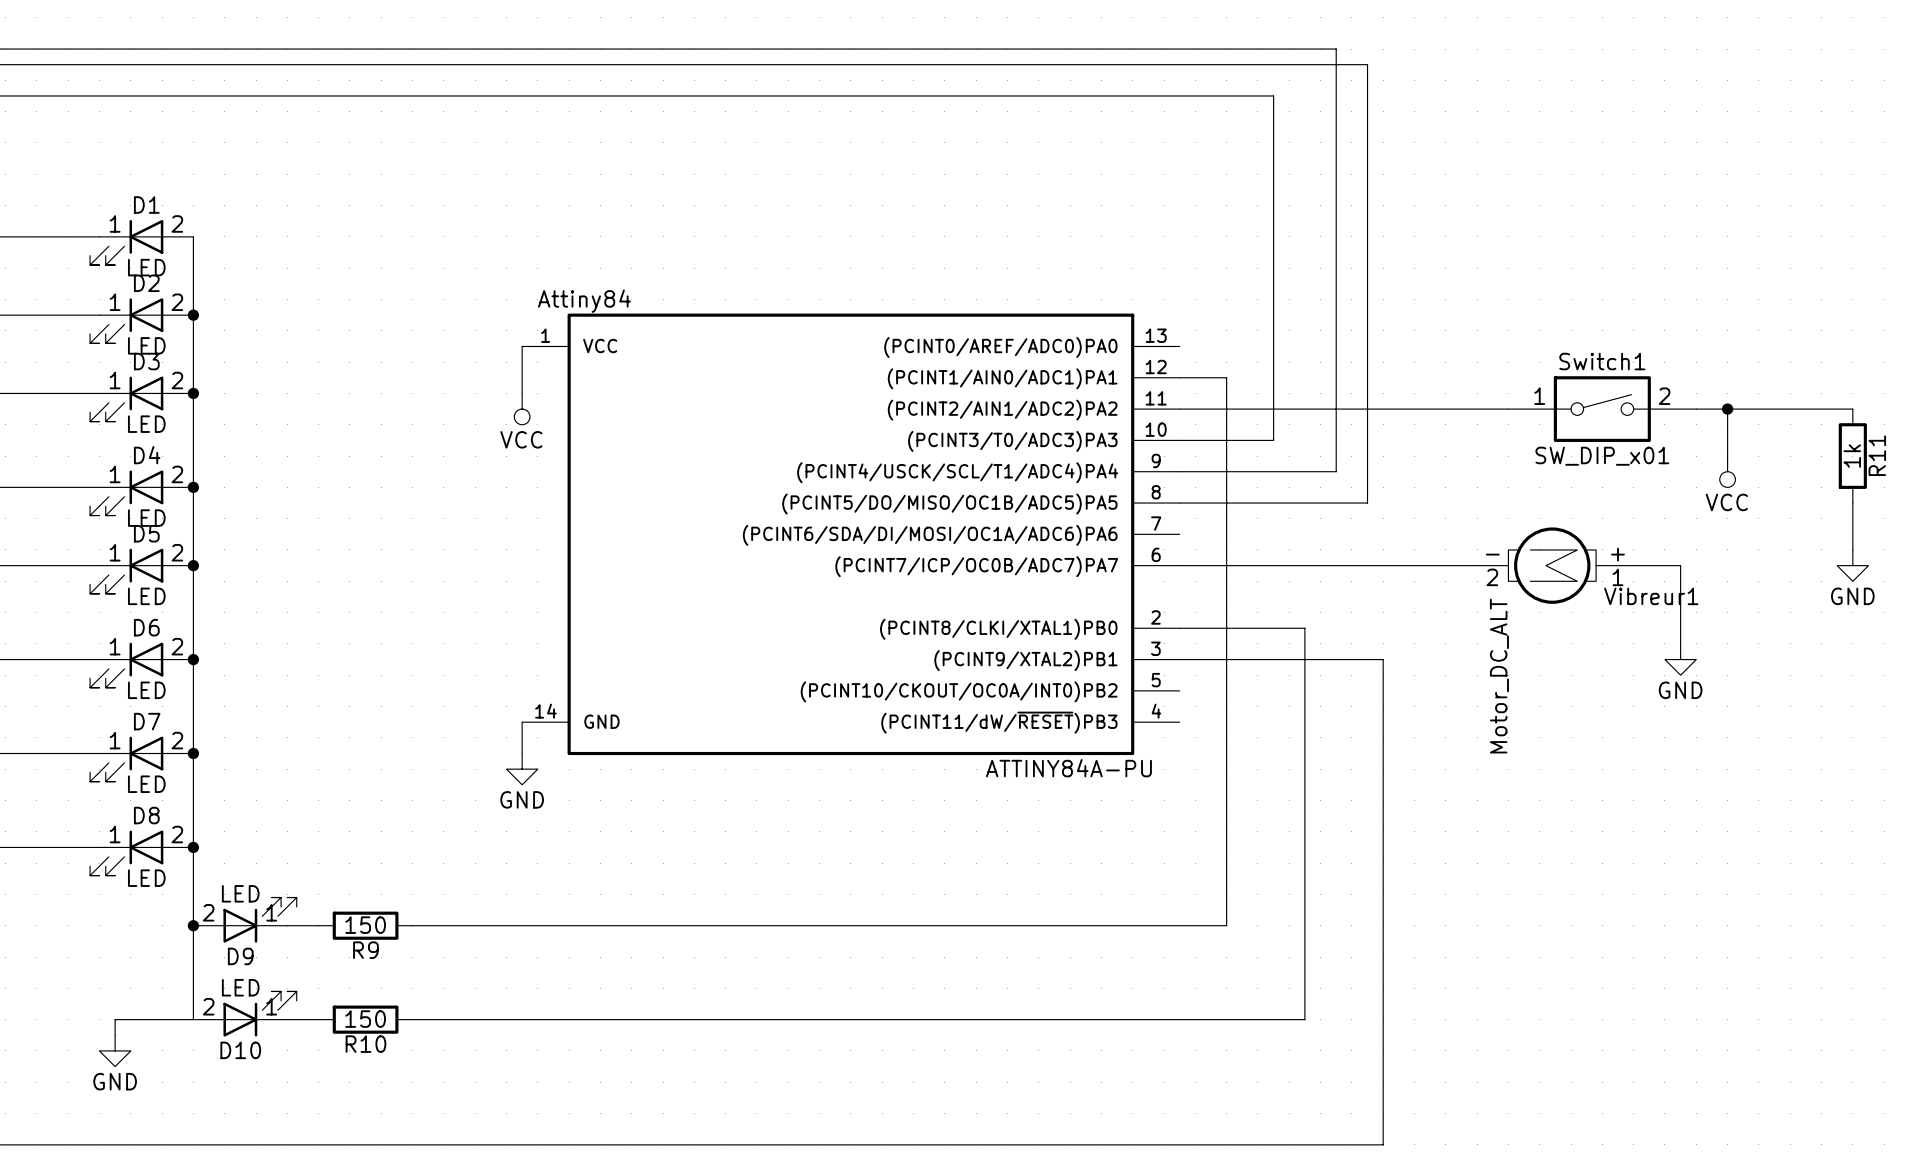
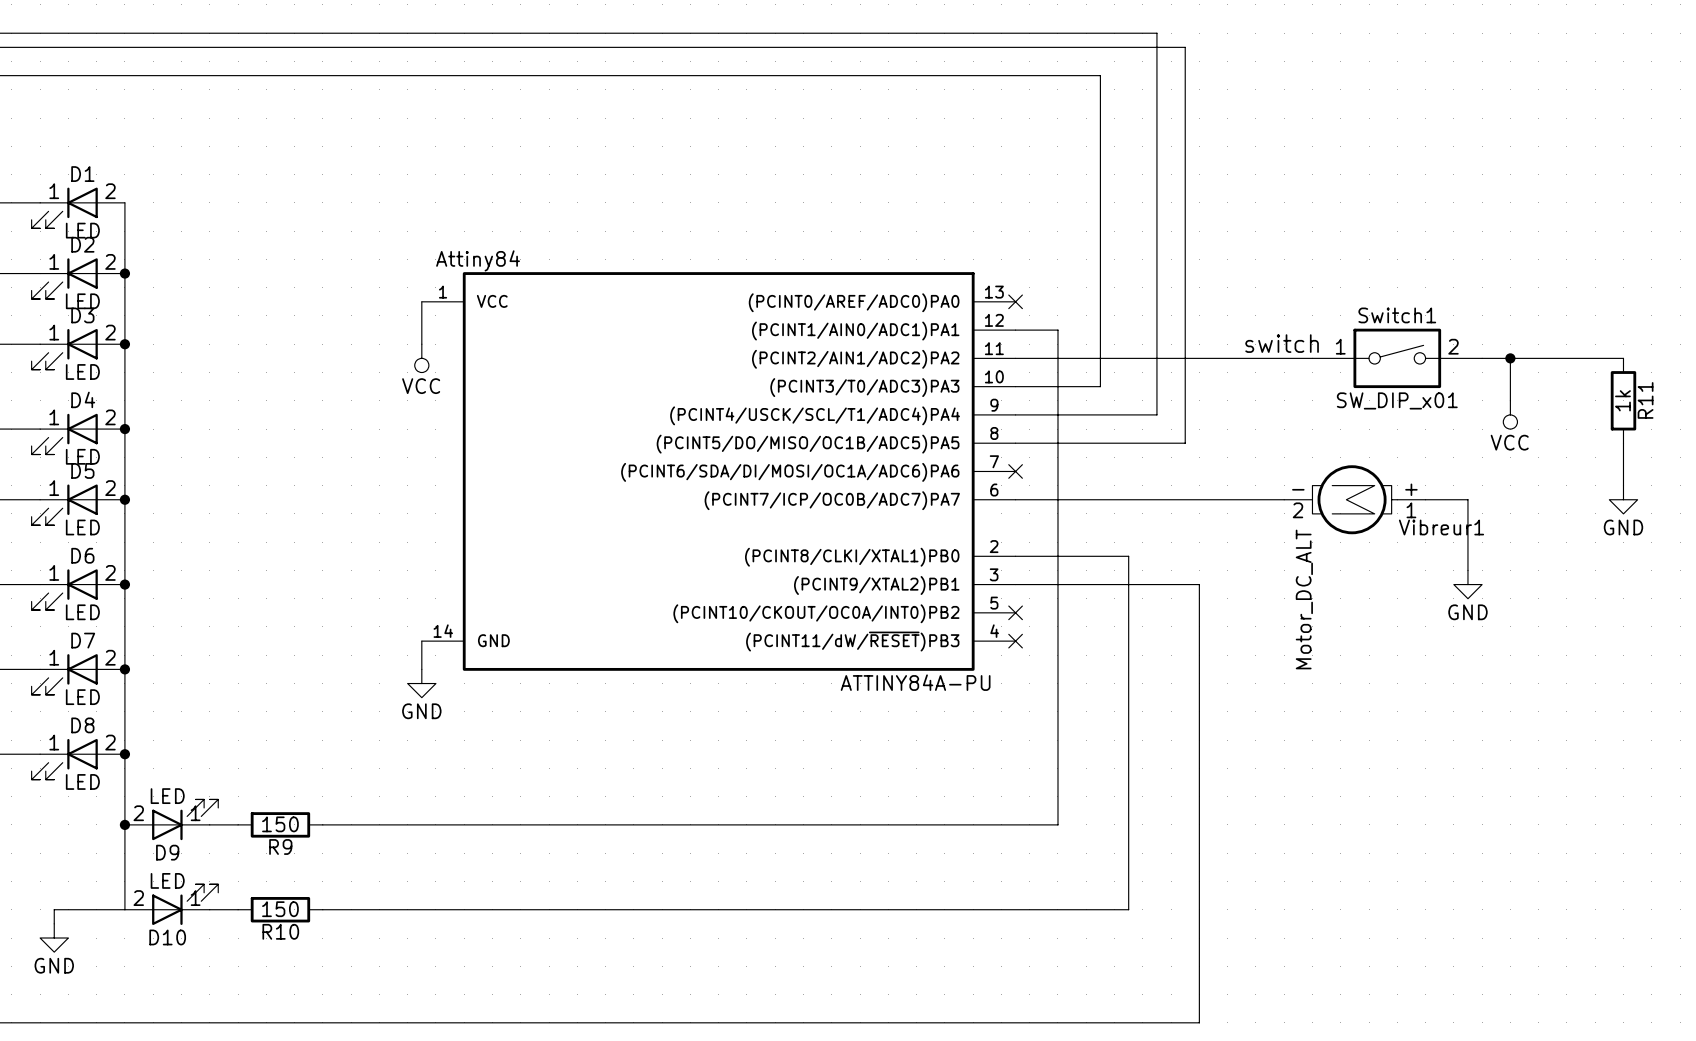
no-connect mark: none -> (1015, 301)
label: none -> switch (1282, 343)
no-connect mark: none -> (1015, 471)
no-connect mark: none -> (1015, 612)
no-connect mark: none -> (1015, 641)

